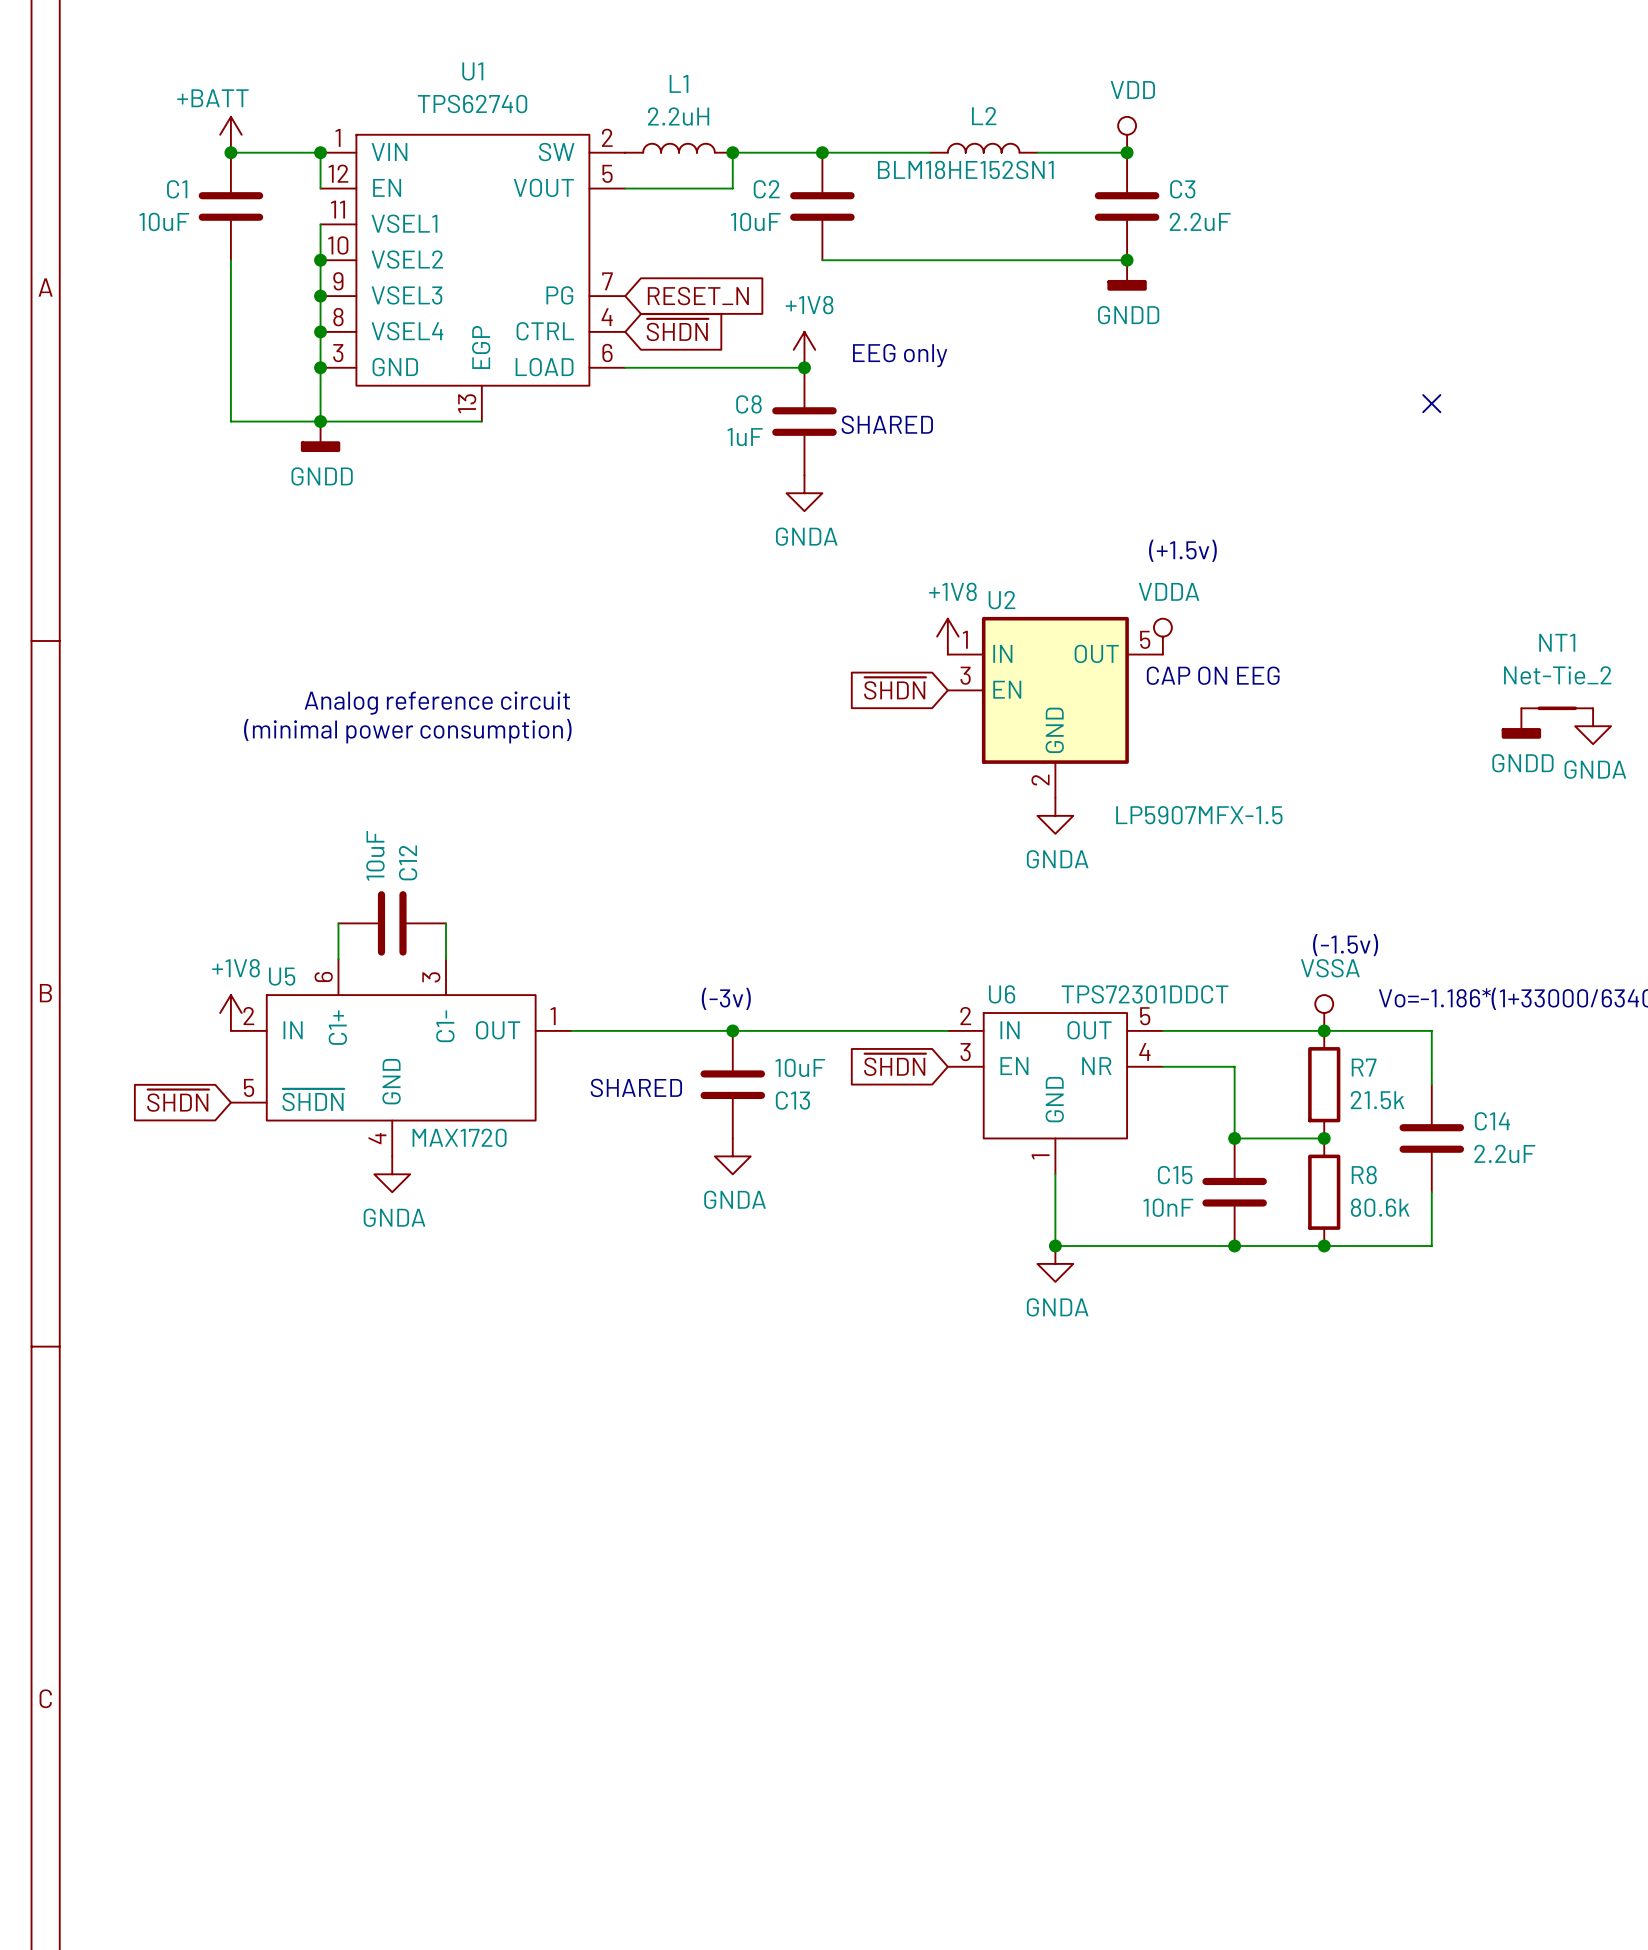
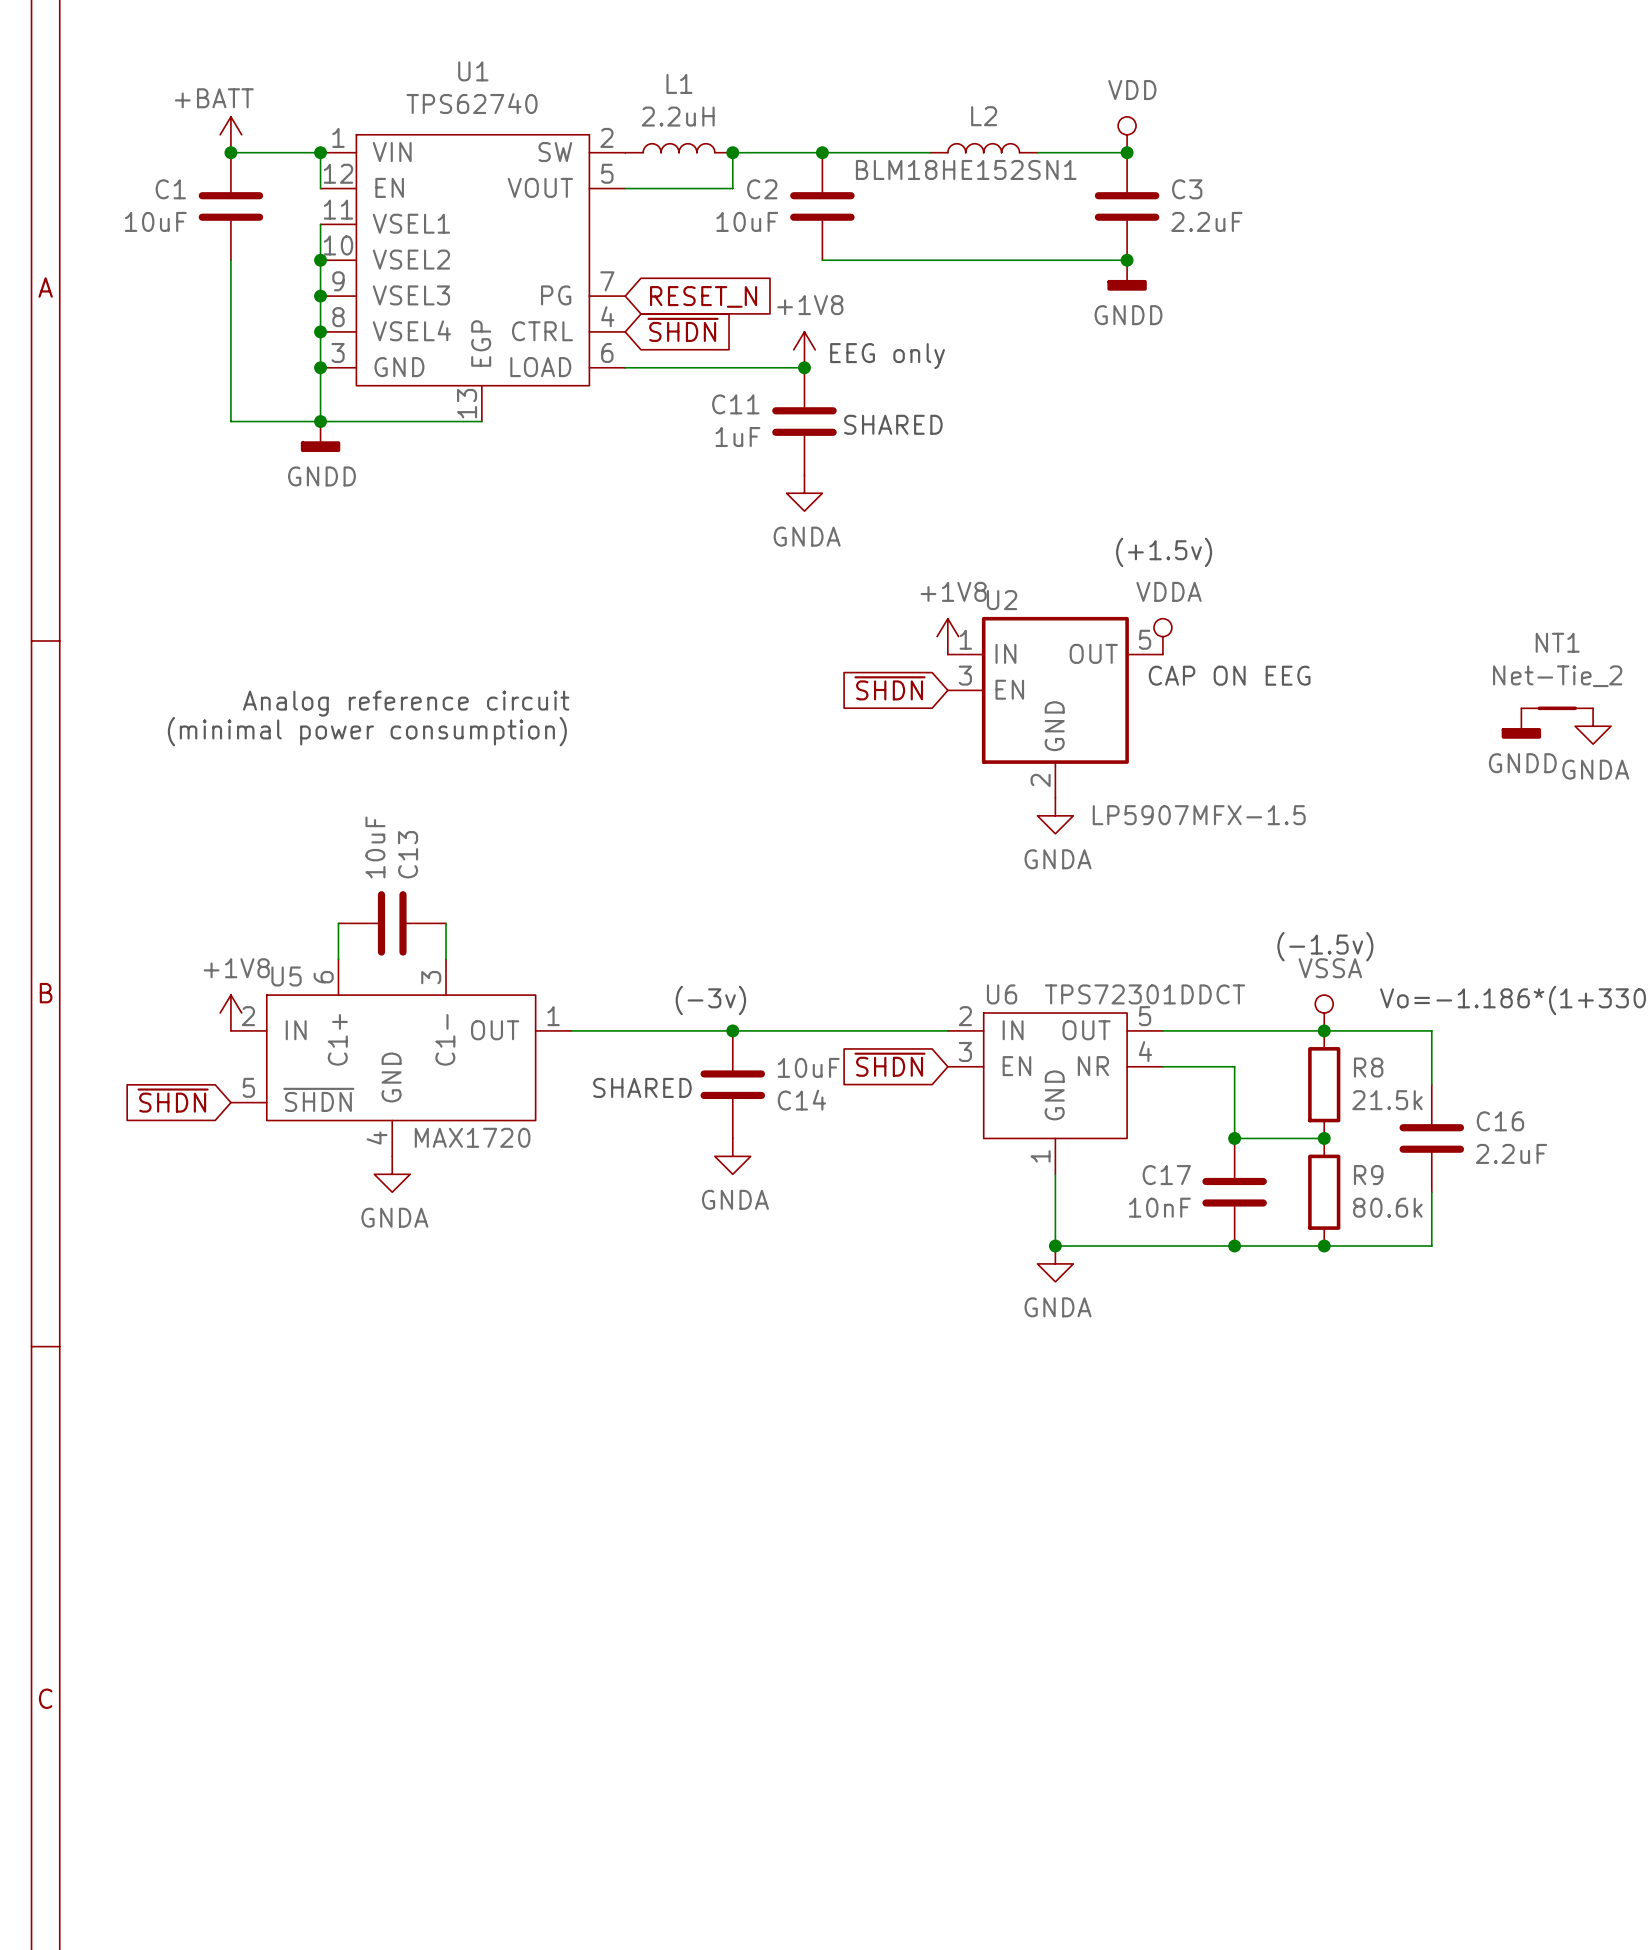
no-connect mark: (1431, 403) -> none
C8 name: C8 (748, 404) -> C11 (735, 404)
C12 name: C12 (408, 862) -> C13 (408, 854)
R7 name: R7 (1364, 1067) -> R8 (1368, 1067)
C13 name: C13 (792, 1100) -> C14 (801, 1100)
C14 name: C14 (1492, 1121) -> C16 (1500, 1121)
C15 name: C15 (1175, 1175) -> C17 (1166, 1175)
R8 name: R8 (1364, 1175) -> R9 (1368, 1175)

